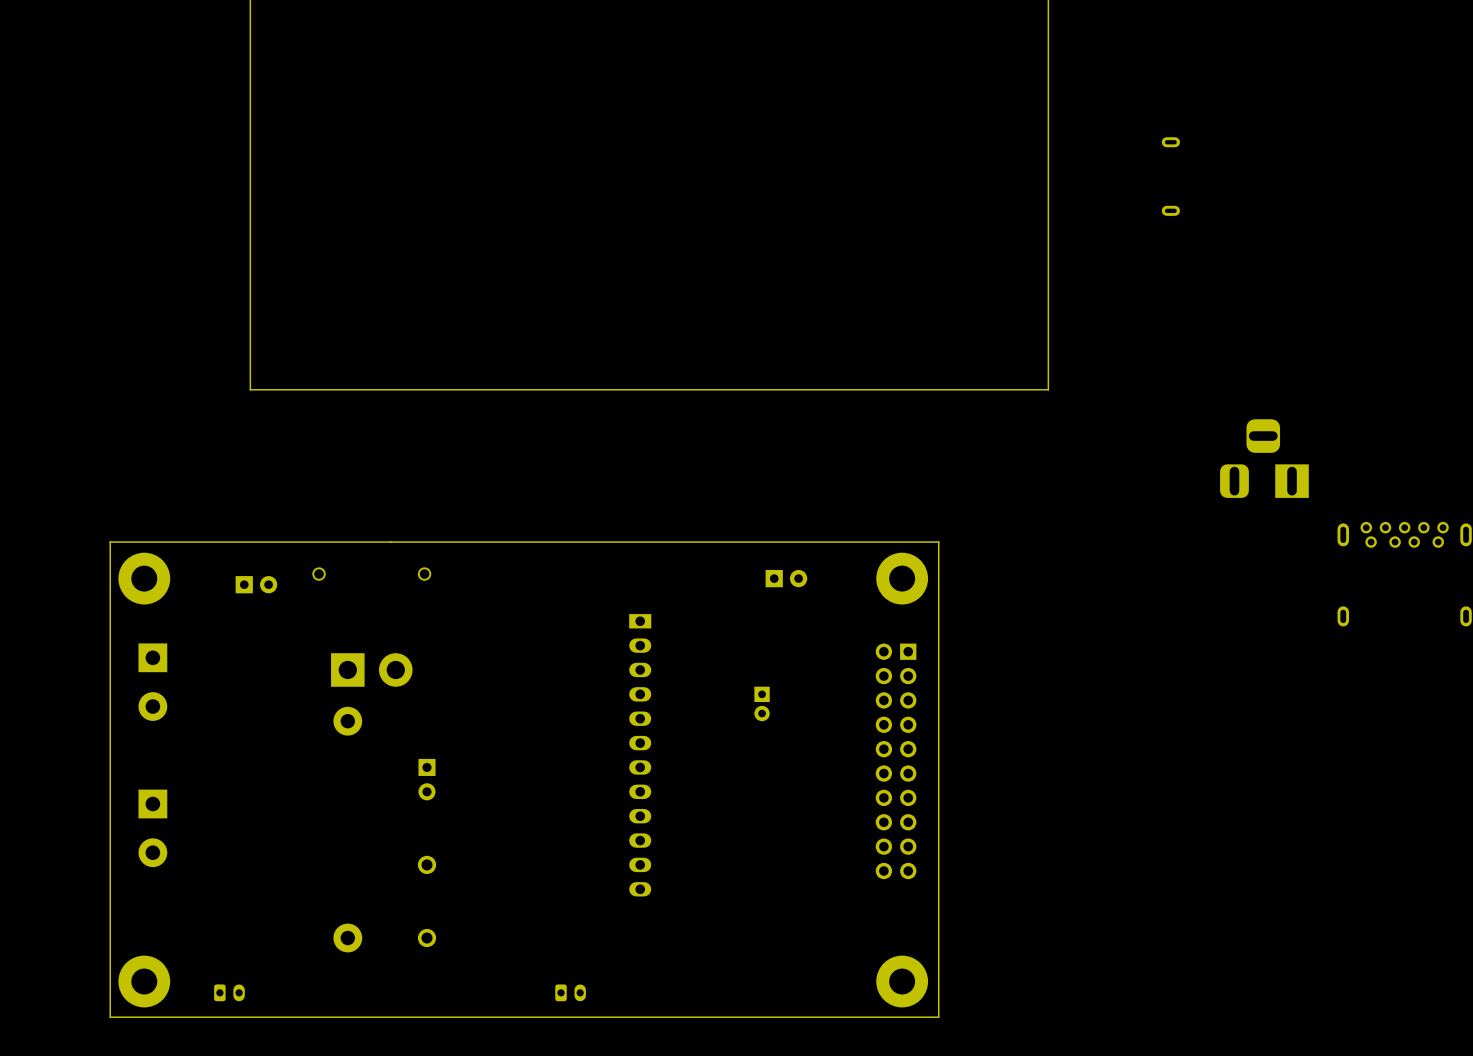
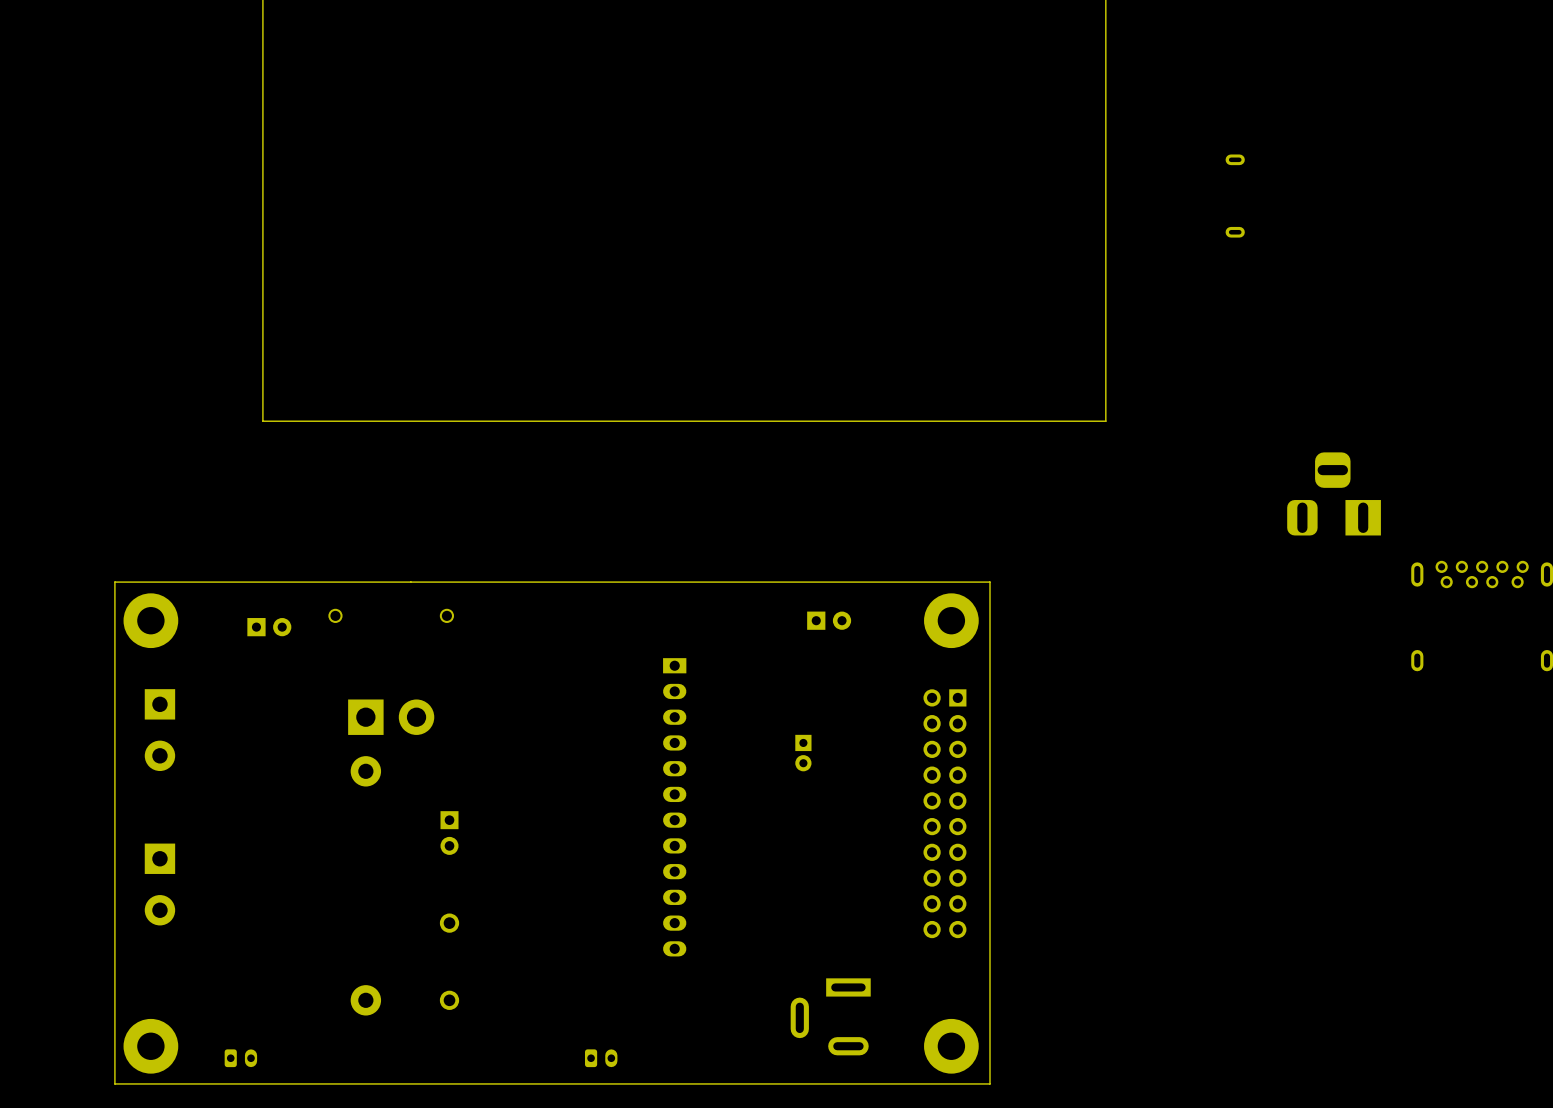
part: none -> (830, 1016)

